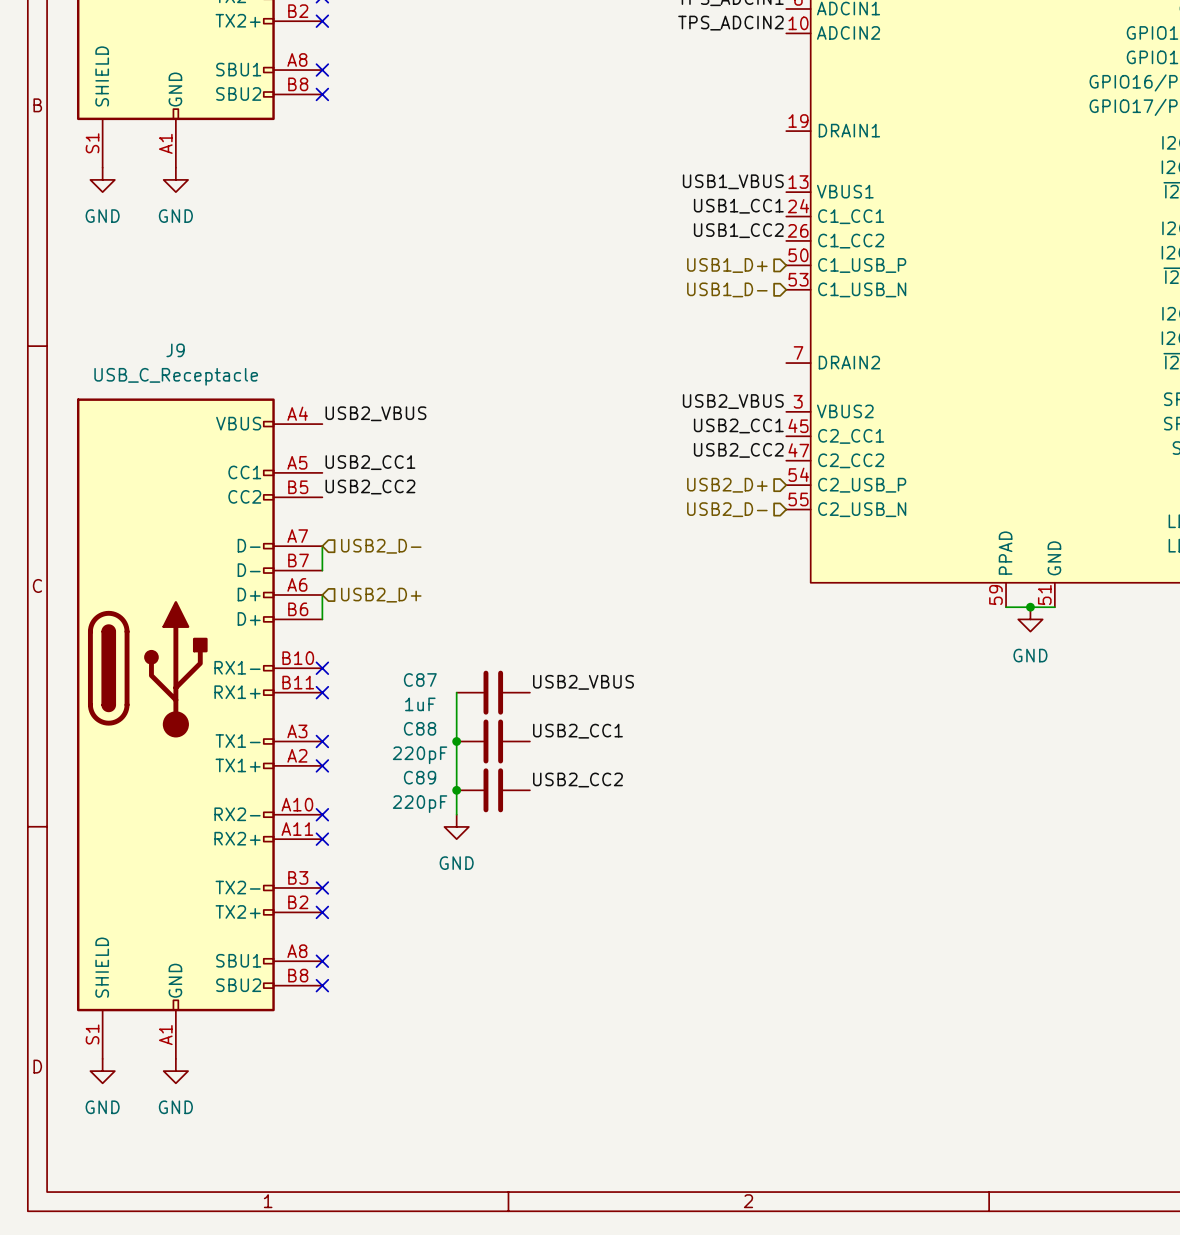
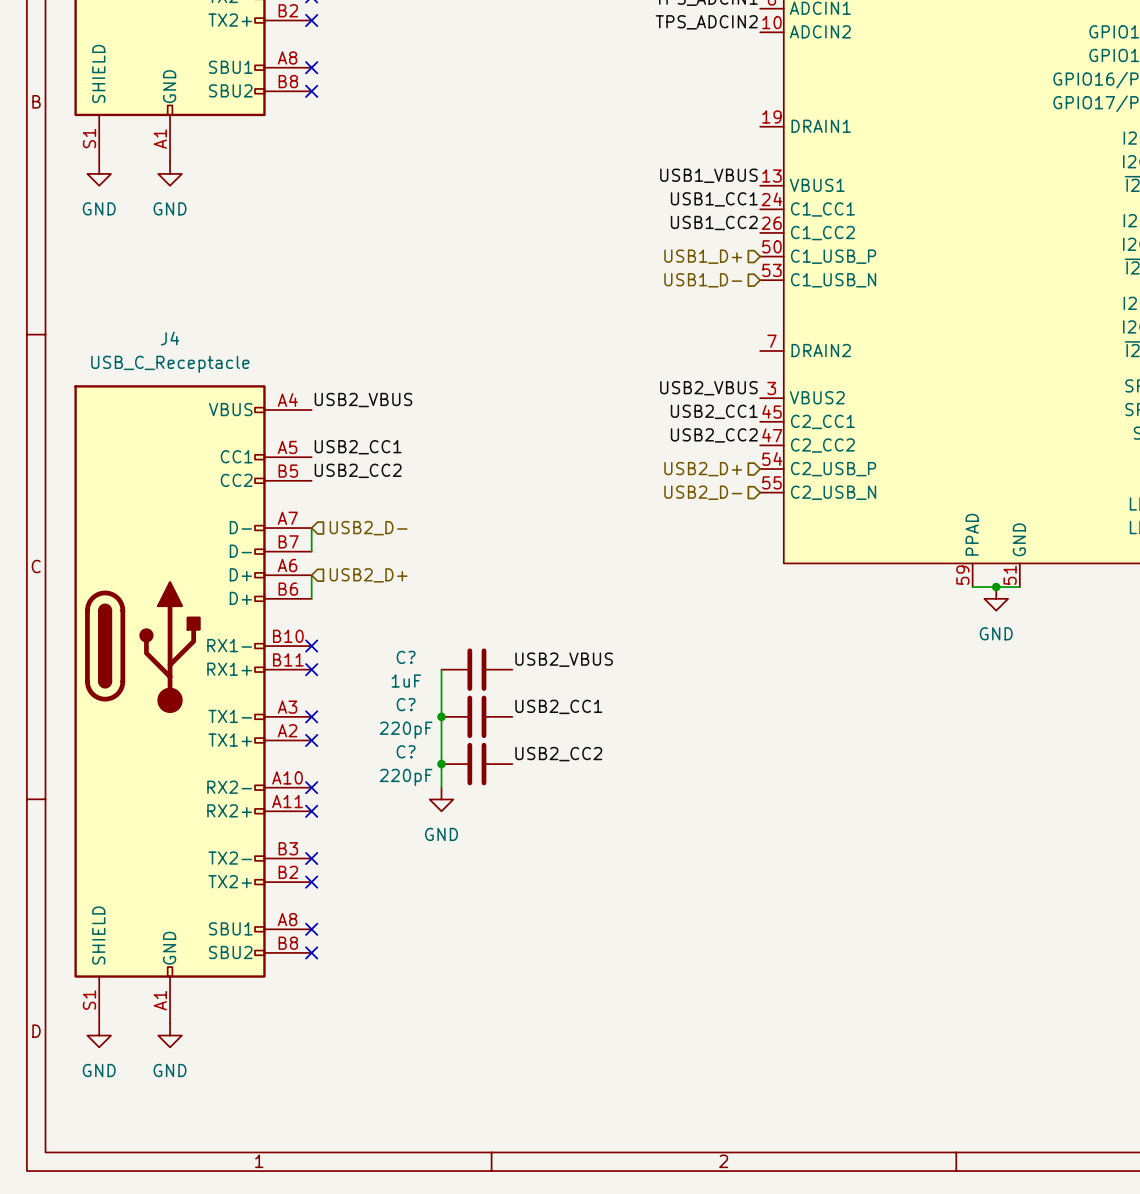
J9 name: J9 (175, 350) -> J4 (170, 338)
C87 name: C87 (420, 679) -> C? (406, 657)
C88 name: C88 (420, 728) -> C? (406, 704)
C89 name: C89 (420, 777) -> C? (406, 751)

